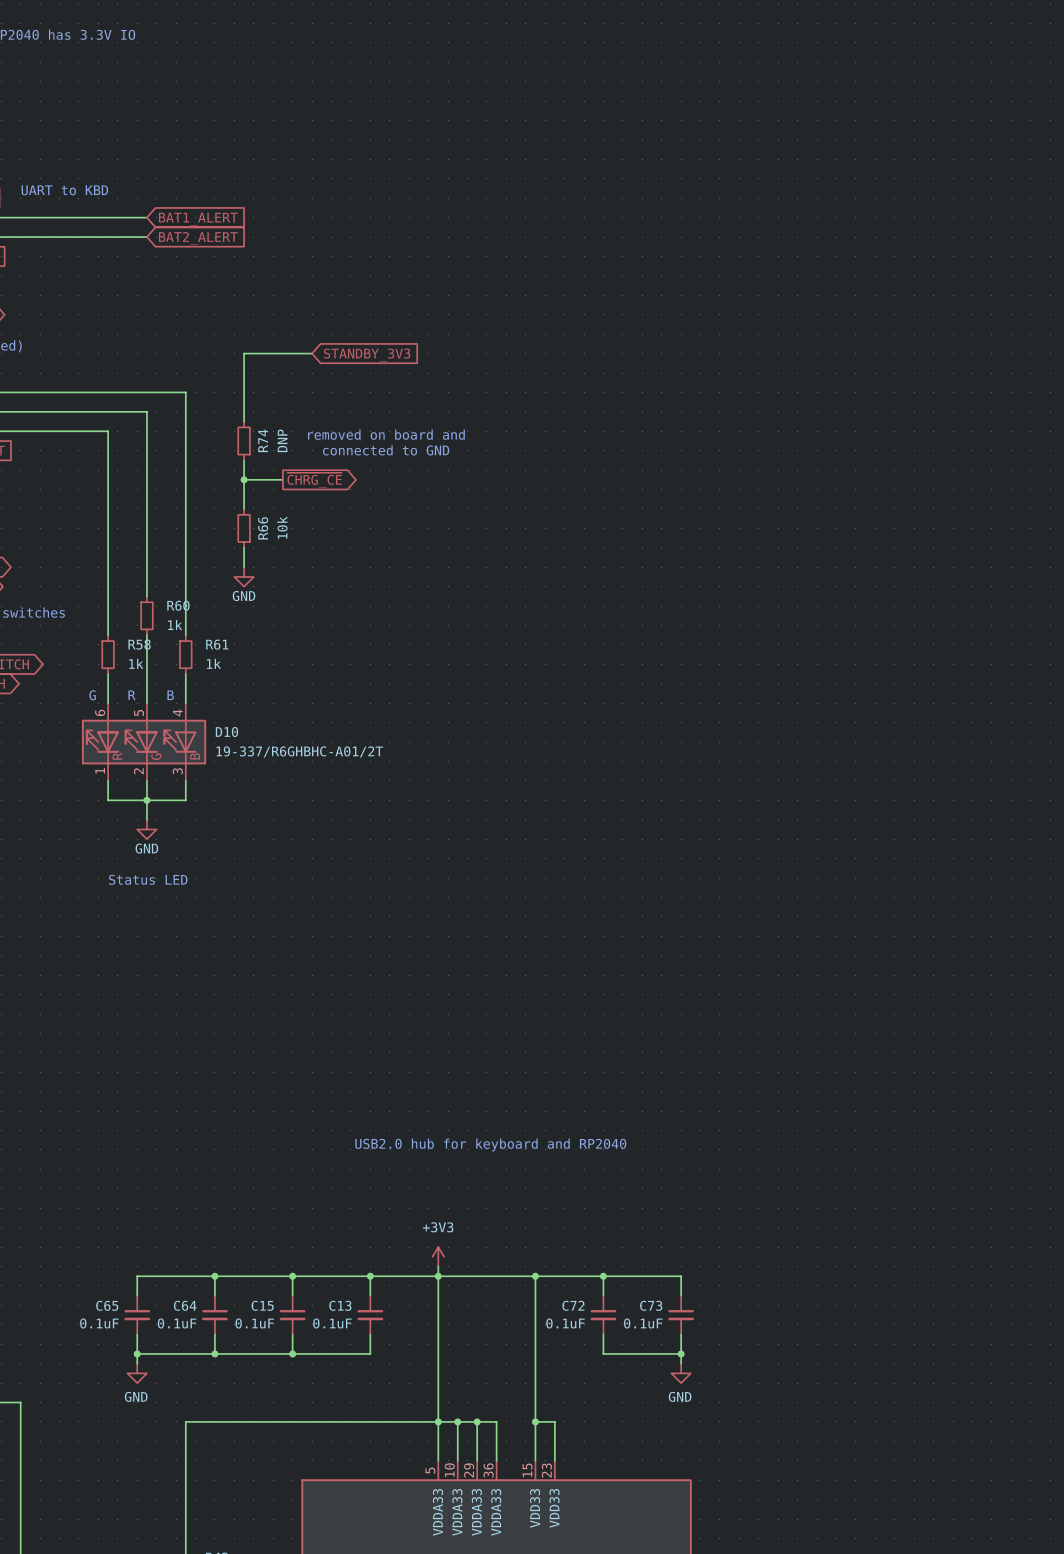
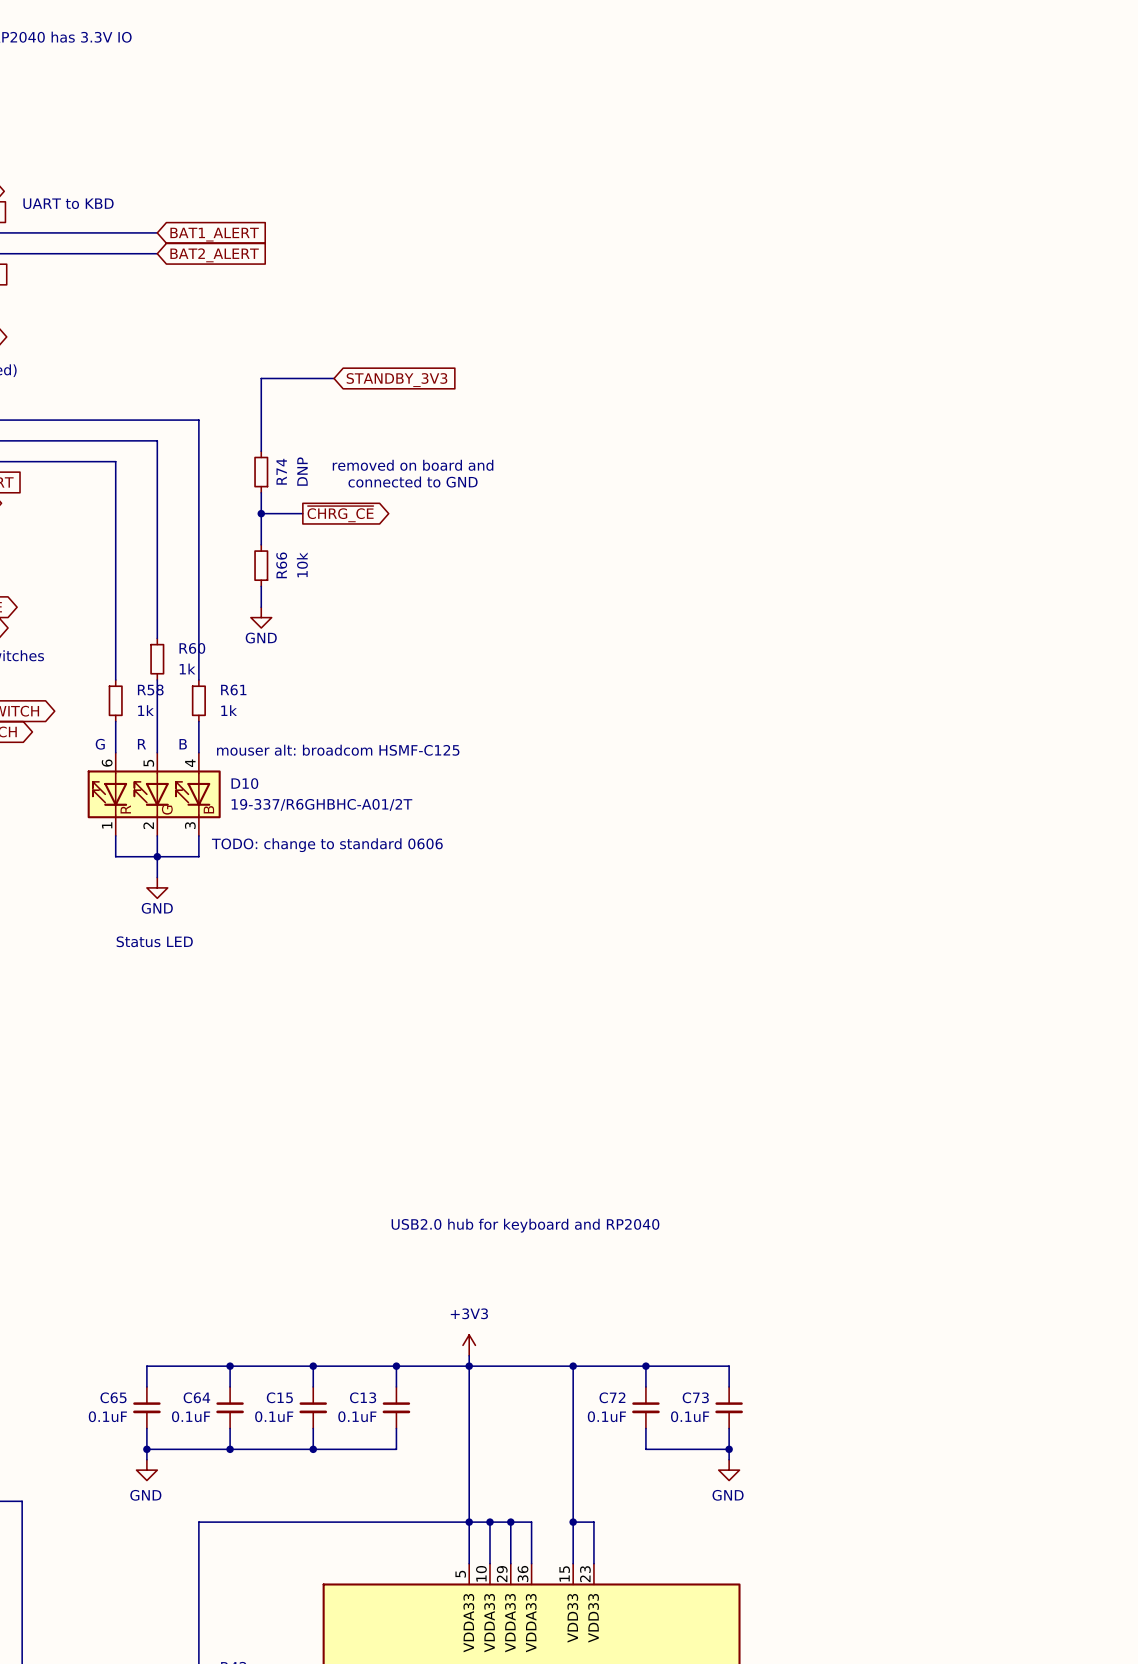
text: none -> mouser alt: broadcom HSMF-C125 (338, 750)
text: none -> TODO: change to standard 0606 (327, 845)

